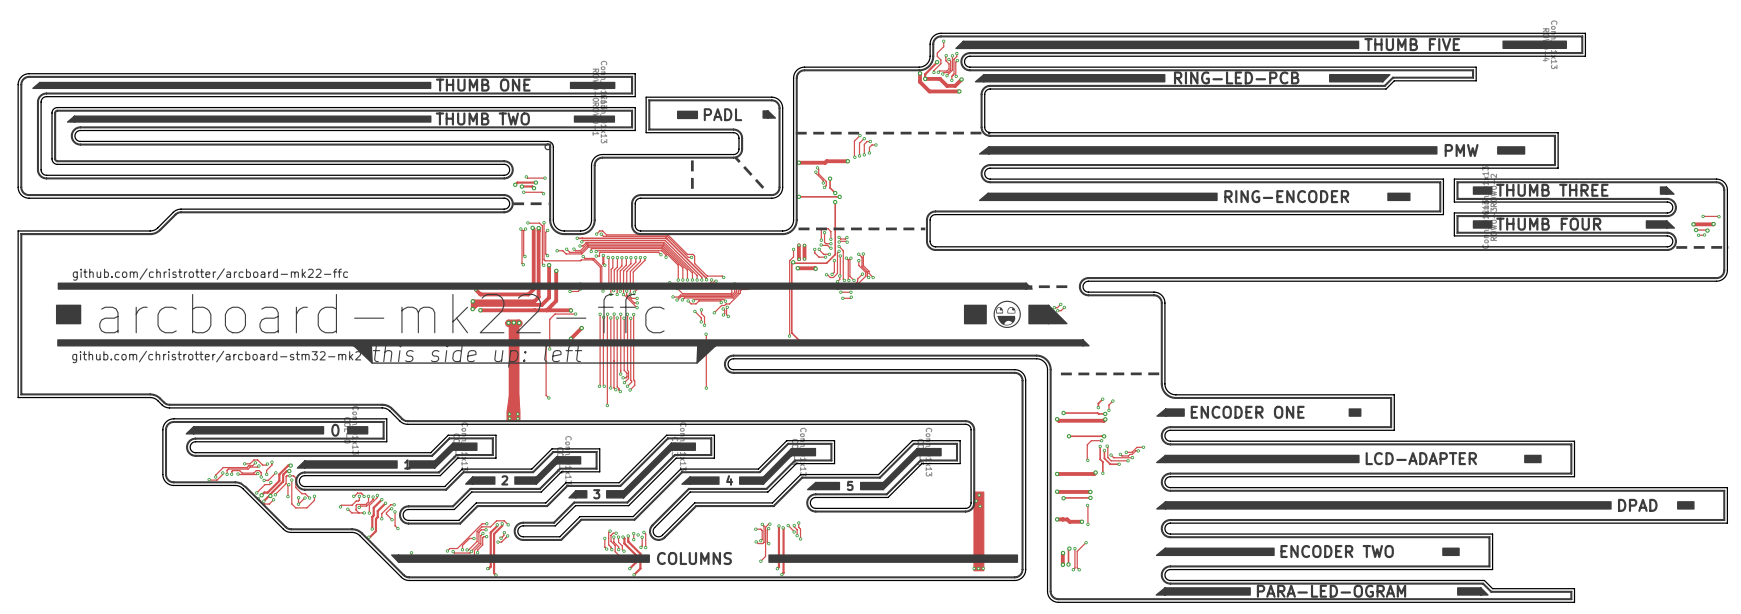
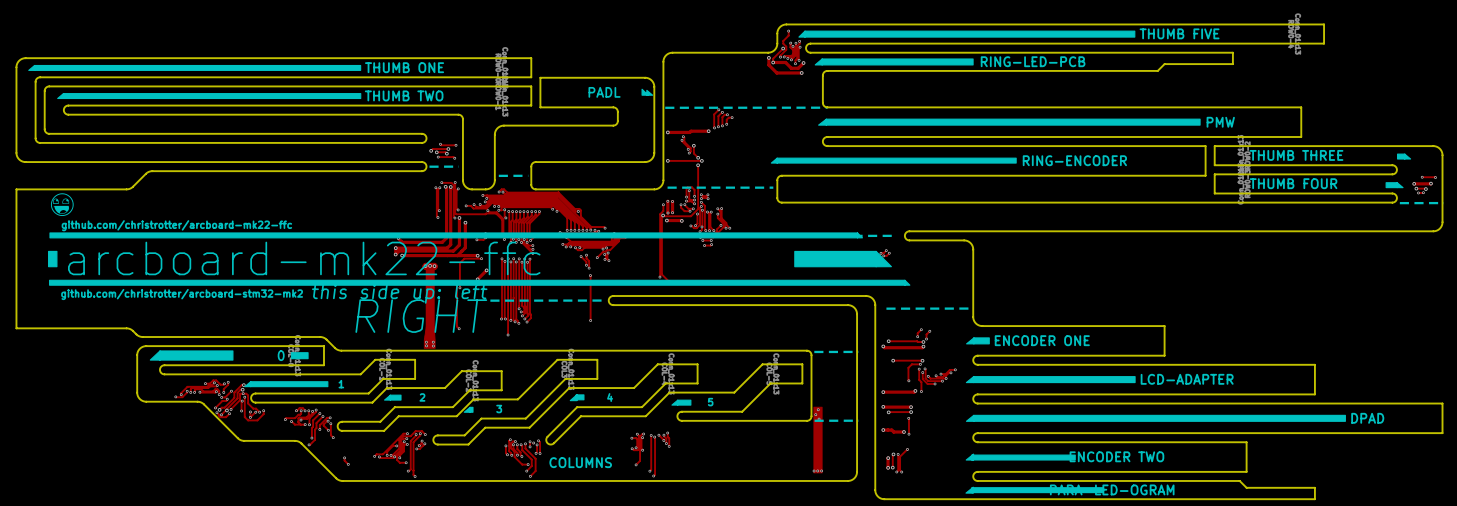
drawing: [1502, 40, 1567, 50] -> none
drawing: [1329, 74, 1391, 83] -> none
drawing: [569, 81, 616, 90] -> none
drawing: [677, 110, 699, 120] -> none
drawing: [762, 110, 769, 119] -> none
drawing: none -> [646, 89, 654, 96]
drawing: [573, 115, 616, 123] -> none
line: (549, 144) (550, 224) (555, 231) (561, 234) (583, 234) (590, 230) (594, 223) (595, 165) (598, 159) (733, 158) (741, 153) (742, 135) (735, 129) (649, 129) (649, 100) (774, 101) (779, 108) (779, 187) (776, 192) (771, 194) (638, 194) (631, 201) (631, 226) (634, 231) (640, 234) (784, 234) (792, 230) (797, 221) (798, 73) (804, 70) (922, 70) (932, 62) (933, 42) (939, 37) (1581, 36) (1581, 52) (967, 52) (962, 56) (961, 62) (964, 68) (969, 70) (1472, 70) (1472, 77) (1392, 77) (1384, 85) (989, 85) (983, 88) (981, 93) (981, 127) (983, 133) (989, 136) (1554, 136) (1554, 164) (989, 164) (983, 168) (981, 174) (983, 180) (990, 182) (1439, 182) (1439, 211) (935, 211) (930, 212) (926, 217) (926, 243) (930, 248) (935, 250) (1668, 250) (1674, 246) (1676, 241) (1674, 235) (1668, 232) (1457, 232) (1457, 216) (1668, 216) (1673, 213) (1676, 207) (1674, 202) (1669, 198) (1457, 198) (1457, 182) (1719, 183) (1723, 190) (1723, 270) (1721, 275) (1717, 277) (1088, 277) (1082, 279) (1079, 286) (1081, 292) (1087, 295) (1154, 295) (1159, 298) (1161, 385) (1164, 392) (1171, 397) (1390, 398) (1390, 426) (1169, 426) (1164, 429) (1161, 434) (1162, 440) (1167, 444) (1570, 444) (1570, 473) (1170, 473) (1165, 474) (1161, 480) (1162, 486) (1167, 490) (1723, 491) (1723, 519) (1169, 519) (1162, 523) (1161, 529) (1164, 535) (1170, 537) (1489, 537) (1489, 566) (1170, 566) (1164, 568) (1161, 573) (1162, 580) (1168, 583) (1482, 584) (1491, 592) (1570, 592) (1570, 598) (1056, 598) (1052, 595) (1051, 591) (1050, 368) (1046, 359) (1036, 355) (733, 355) (728, 357) (724, 363) (726, 369) (733, 373) (1019, 374) (1022, 380) (1022, 569) (1019, 574) (1015, 576) (408, 576) (403, 574) (358, 530) (288, 528) (245, 486) -> none
line: (550, 146) (550, 147) (550, 147) (550, 148) (549, 148) (547, 149) (545, 146) (545, 145) (545, 145) (545, 145) (546, 144) (547, 144) (549, 144) (80, 144) (74, 142) (71, 135) (74, 129) (80, 126) (631, 126) (631, 111) (57, 111) (55, 113) (55, 158) (57, 160) (504, 160) (510, 163) (512, 166) (513, 171) (510, 176) (504, 178) (46, 178) (40, 176) (37, 171) (37, 100) (41, 94) (46, 93) (631, 93) (631, 77) (26, 77) (21, 84) (21, 187) (23, 191) (27, 194) (504, 194) (510, 197) (513, 203) (510, 210) (504, 212) (181, 212) (176, 214) (158, 232) (151, 234) (21, 234) (21, 393) (151, 394) (156, 395) (169, 404) (383, 404) (390, 406) (402, 419) (407, 420) (965, 420) (971, 422) (974, 427) (974, 504) (972, 508) (967, 511) (815, 511) (811, 510) (808, 507) (806, 502) (807, 499) (810, 495) (814, 494) (886, 493) (920, 460) (956, 460) (956, 444) (913, 444) (880, 478) (802, 478) (773, 506) (696, 506) (663, 539) (655, 539) (650, 535) (649, 530) (651, 525) (688, 488) (766, 488) (794, 460) (831, 460) (831, 444) (788, 444) (759, 472) (682, 472) (634, 520) (581, 520) (561, 540) (523, 540) (517, 538) (514, 533) (514, 527) (518, 523) (523, 522) (553, 522) (574, 502) (627, 502) (674, 454) (710, 454) (710, 438) (668, 438) (620, 486) (567, 486) (547, 506) (477, 506) (460, 523) (408, 523) (402, 521) (399, 516) (400, 510) (405, 506) (452, 505) (470, 488) (539, 488) (560, 468) (596, 468) (596, 452) (553, 452) (533, 472) (463, 472) (446, 490) (304, 490) (299, 488) (295, 482) (297, 475) (303, 472) (438, 472) (456, 454) (492, 454) (492, 438) (449, 438) (432, 456) (195, 456) (189, 453) (186, 447) (189, 440) (194, 438) (383, 438) (383, 422) (173, 422) (167, 426) (166, 474) (170, 480) (239, 482) (241, 483) (287, 528) (357, 530) (403, 575) (408, 577) (1014, 577) (1021, 574) (1022, 569) (1022, 380) (1019, 374) (1014, 372) (733, 372) (727, 370) (725, 364) (727, 358) (733, 356) (1036, 356) (1045, 359) (1050, 369) (1050, 591) (1052, 597) (1057, 599) (1571, 599) (1571, 591) (1491, 591) (1483, 583) (1169, 583) (1163, 580) (1162, 573) (1164, 569) (1170, 566) (1489, 566) (1489, 536) (1170, 536) (1164, 534) (1162, 529) (1163, 523) (1169, 520) (1724, 520) (1724, 490) (1167, 489) (1162, 485) (1162, 480) (1165, 475) (1170, 473) (1571, 473) (1571, 443) (1168, 443) (1163, 440) (1162, 434) (1164, 429) (1169, 427) (1391, 427) (1391, 397) (1171, 396) (1165, 392) (1162, 385) (1162, 303) (1160, 298) (1154, 294) (1087, 294) (1082, 292) (1080, 286) (1082, 280) (1088, 278) (1717, 278) (1722, 275) (1724, 270) (1724, 190) (1719, 182) (1457, 181) (1457, 199) (1667, 199) (1673, 202) (1675, 207) (1672, 213) (1667, 215) (1457, 215) (1457, 233) (1668, 233) (1673, 235) (1675, 241) (1673, 246) (1668, 249) (935, 249) (930, 247) (927, 243) (927, 217) (930, 213) (935, 211) (1440, 211) (1440, 181) (990, 181) (984, 179) (982, 174) (983, 168) (989, 165) (1555, 165) (1555, 135) (990, 135) (984, 133) (982, 128) (982, 93) (984, 88) (989, 86) (1384, 86) (1393, 78) (1473, 78) (1473, 69) (969, 69) (964, 67) (961, 62) (962, 57) (967, 54) (1582, 53) (1582, 36) (938, 36) (933, 42) (931, 62) (922, 69) (804, 69) (798, 73) (796, 78) (796, 221) (791, 230) (782, 233) (640, 233) (634, 231) (632, 226) (632, 202) (638, 195) (771, 195) (777, 193) (779, 187) (779, 108) (778, 103) (773, 100) (648, 99) (648, 129) (735, 130) (741, 136) (740, 153) (733, 157) (599, 157) (594, 164) (592, 225) (583, 233) (564, 233) (555, 230) (550, 221) (550, 144) (80, 144) (73, 140) (72, 133) (75, 129) (80, 127) (632, 127) (632, 110) (57, 110) (54, 113) (54, 158) (57, 161) (504, 161) (510, 164) (512, 170) (509, 176) (504, 178) (46, 178) (40, 175) (38, 170) (38, 99) (41, 95) (46, 93) (632, 93) (632, 76) (24, 77) (20, 84) (20, 187) (22, 192) (26, 195) (504, 195) (509, 197) (512, 203) (509, 209) (504, 211) (180, 211) (175, 213) (158, 230) (151, 233) (20, 233) (20, 394) (151, 394) (169, 405) (383, 405) (389, 407) (402, 419) (407, 421) (965, 421) (970, 423) (973, 428) (973, 504) (967, 510) (815, 511) (809, 507) (808, 500) (814, 494) (886, 494) (920, 460) (957, 460) (957, 443) (913, 443) (879, 477) (801, 477) (773, 505) (695, 505) (663, 537) (657, 539) (652, 536) (650, 531) (652, 526) (689, 489) (766, 489) (795, 460) (831, 460) (831, 443) (787, 443) (759, 471) (681, 471) (634, 519) (581, 519) (560, 539) (523, 539) (515, 534) (515, 529) (518, 524) (554, 523) (574, 502) (627, 502) (675, 455) (711, 455) (711, 437) (667, 437) (620, 485) (567, 485) (546, 505) (477, 505) (459, 523) (408, 523) (403, 521) (400, 516) (402, 509) (406, 507) (453, 506) (470, 489) (540, 489) (560, 469) (597, 469) (597, 451) (553, 451) (532, 471) (463, 471) (445, 489) (304, 489) (299, 486) (296, 481) (299, 475) (303, 472) (439, 472) (456, 455) (493, 455) (493, 437) (449, 437) (431, 455) (195, 455) (190, 453) (187, 448) (189, 442) (194, 439) (384, 439) (384, 421) (173, 421) (167, 424) (165, 429) (165, 474) (168, 481) (173, 482) (236, 482) (244, 486) -> none
drawing: [1497, 146, 1526, 155] -> none
line: (735, 157) (763, 187) -> none
line: (692, 159) (692, 188) -> none
drawing: [1472, 186, 1493, 195] -> none
drawing: [1659, 186, 1675, 195] -> none
drawing: none -> [1397, 153, 1412, 160]
drawing: none -> [770, 157, 1017, 164]
drawing: [978, 192, 1218, 202] -> none
drawing: [1387, 192, 1411, 202] -> none
line: none -> (528, 175) (498, 175)
drawing: [1472, 220, 1493, 229] -> none
drawing: [1645, 220, 1676, 229] -> none
drawing: none -> [1385, 182, 1404, 189]
drawing: none -> [50, 193, 74, 217]
drawing: [993, 300, 1021, 328] -> none
drawing: [55, 304, 82, 325] -> none
drawing: none -> [48, 250, 58, 268]
drawing: none -> [794, 250, 877, 268]
drawing: [963, 304, 987, 325] -> none
drawing: [1028, 304, 1050, 325] -> none
text position: arcboard-mk22-ffc (381, 313) -> arcboard-mk22-ffc (304, 258)
drawing: [351, 342, 373, 364] -> none
drawing: [696, 344, 717, 364] -> none
line: (697, 363) (372, 363) -> none
line: none -> (605, 300) (490, 300)
text: none -> RIGHT (421, 316)
drawing: [1348, 408, 1362, 417] -> none
drawing: none -> [149, 350, 234, 361]
line: none -> (858, 351) (814, 351)
drawing: [185, 426, 325, 435] -> none
drawing: [408, 442, 478, 469] -> none
drawing: [606, 442, 696, 499] -> none
drawing: [739, 447, 817, 485] -> none
drawing: [860, 447, 942, 491] -> none
drawing: [1524, 454, 1542, 464] -> none
drawing: [514, 456, 582, 485] -> none
drawing: none -> [244, 381, 329, 388]
drawing: [296, 460, 398, 469] -> none
drawing: none -> [384, 394, 402, 401]
drawing: [465, 476, 496, 485] -> none
drawing: none -> [575, 394, 585, 401]
drawing: [689, 476, 720, 485] -> none
drawing: [806, 481, 841, 491] -> none
drawing: none -> [671, 399, 692, 406]
drawing: [568, 490, 588, 499] -> none
drawing: none -> [463, 406, 474, 413]
drawing: [1677, 501, 1695, 510] -> none
line: none -> (858, 420) (814, 420)
drawing: [1164, 547, 1275, 557] -> none
drawing: [1442, 547, 1460, 557] -> none
drawing: none -> [971, 454, 1076, 461]
drawing: [391, 554, 650, 563] -> none
drawing: [768, 554, 1019, 563] -> none
drawing: none -> [971, 487, 1105, 494]
drawing: [1164, 587, 1251, 596] -> none
drawing: [1457, 587, 1489, 596] -> none

